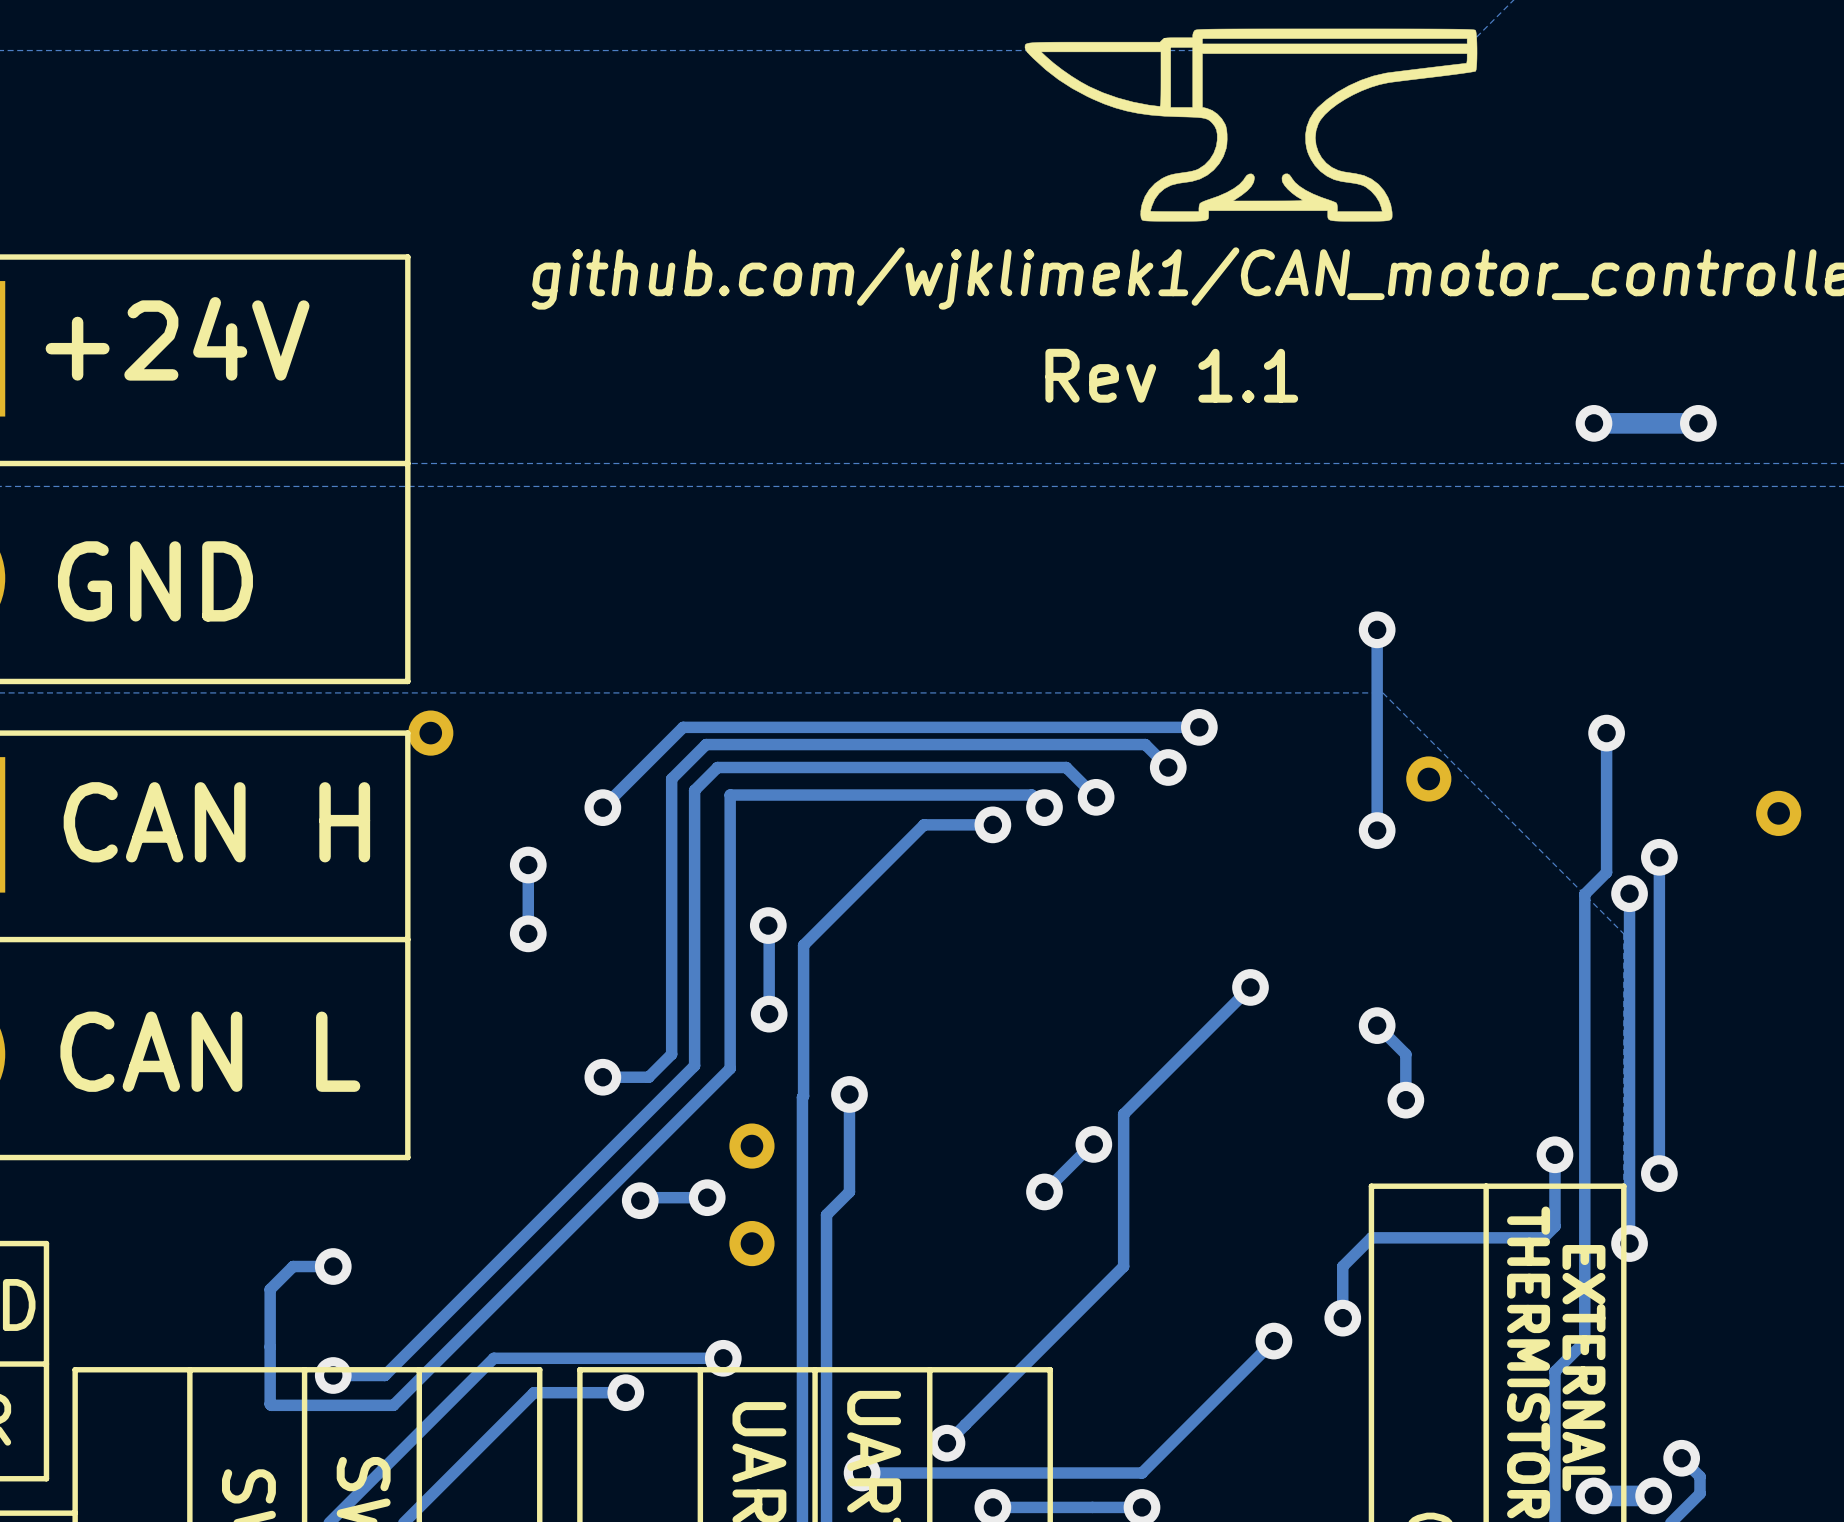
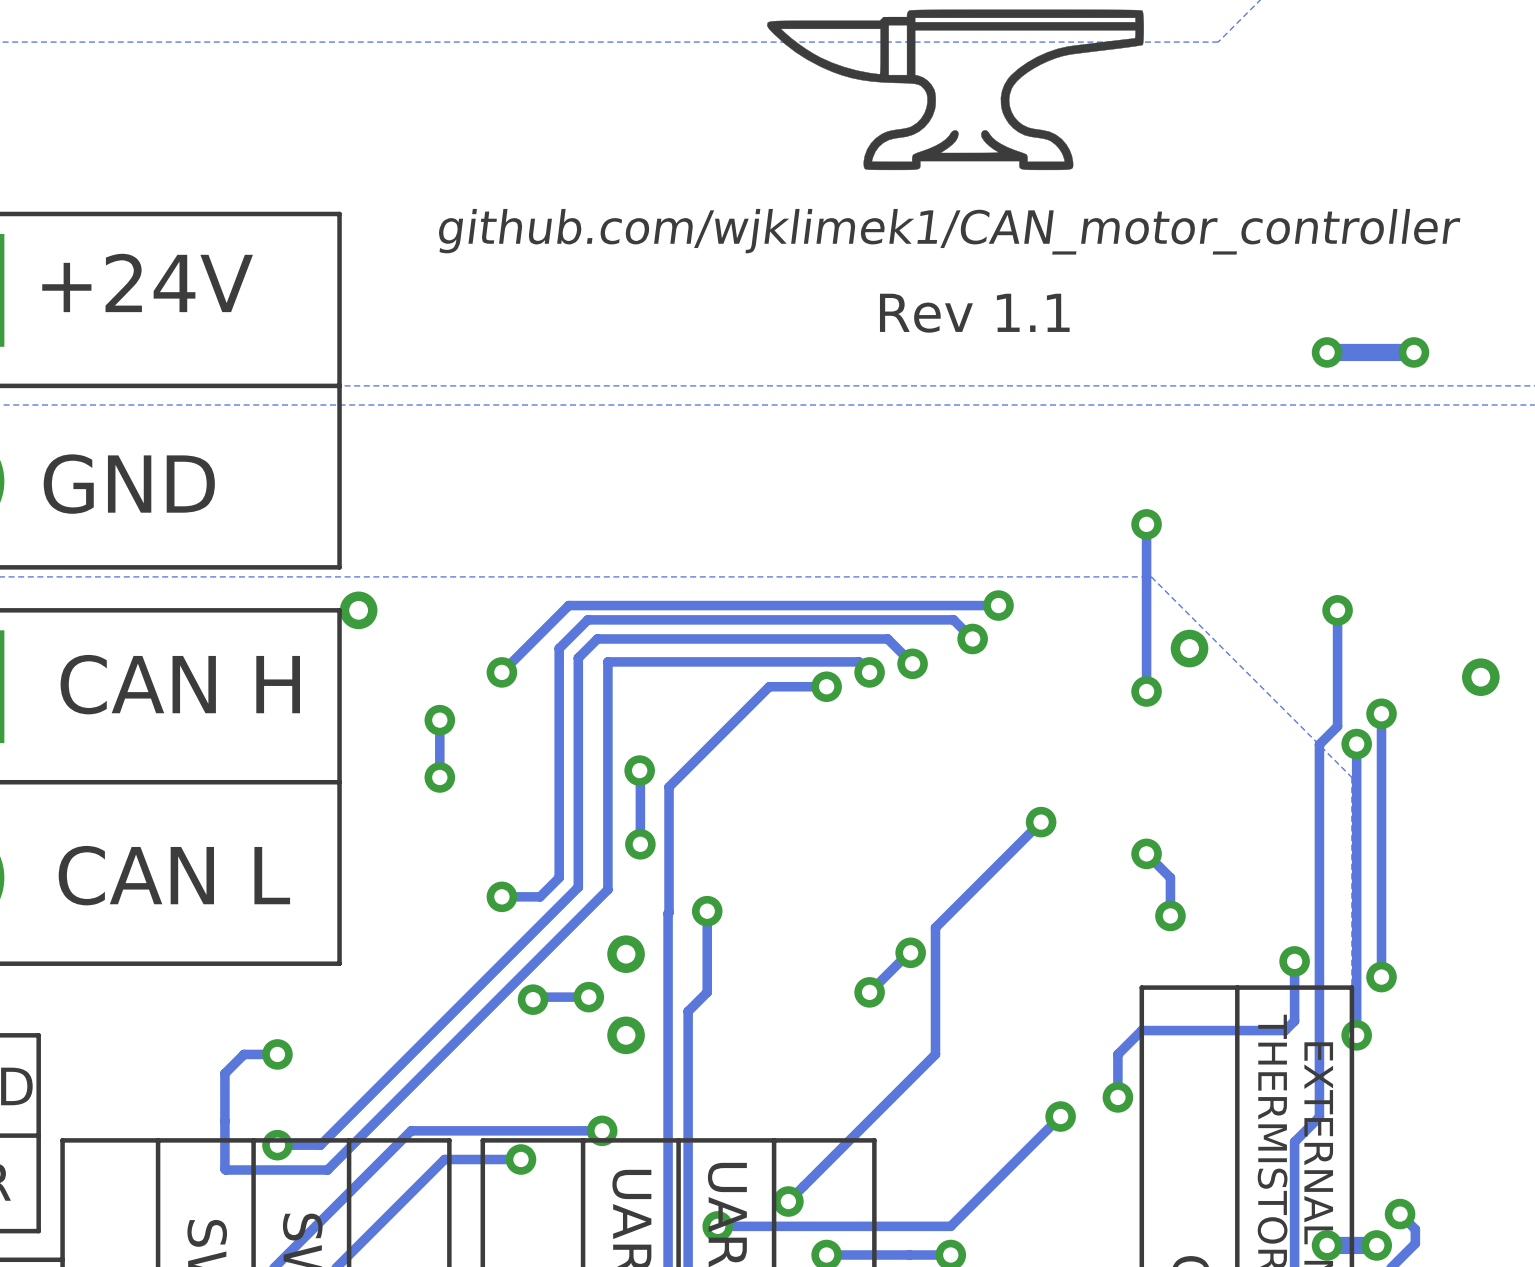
drawing position: (1251, 125) -> (955, 89)

